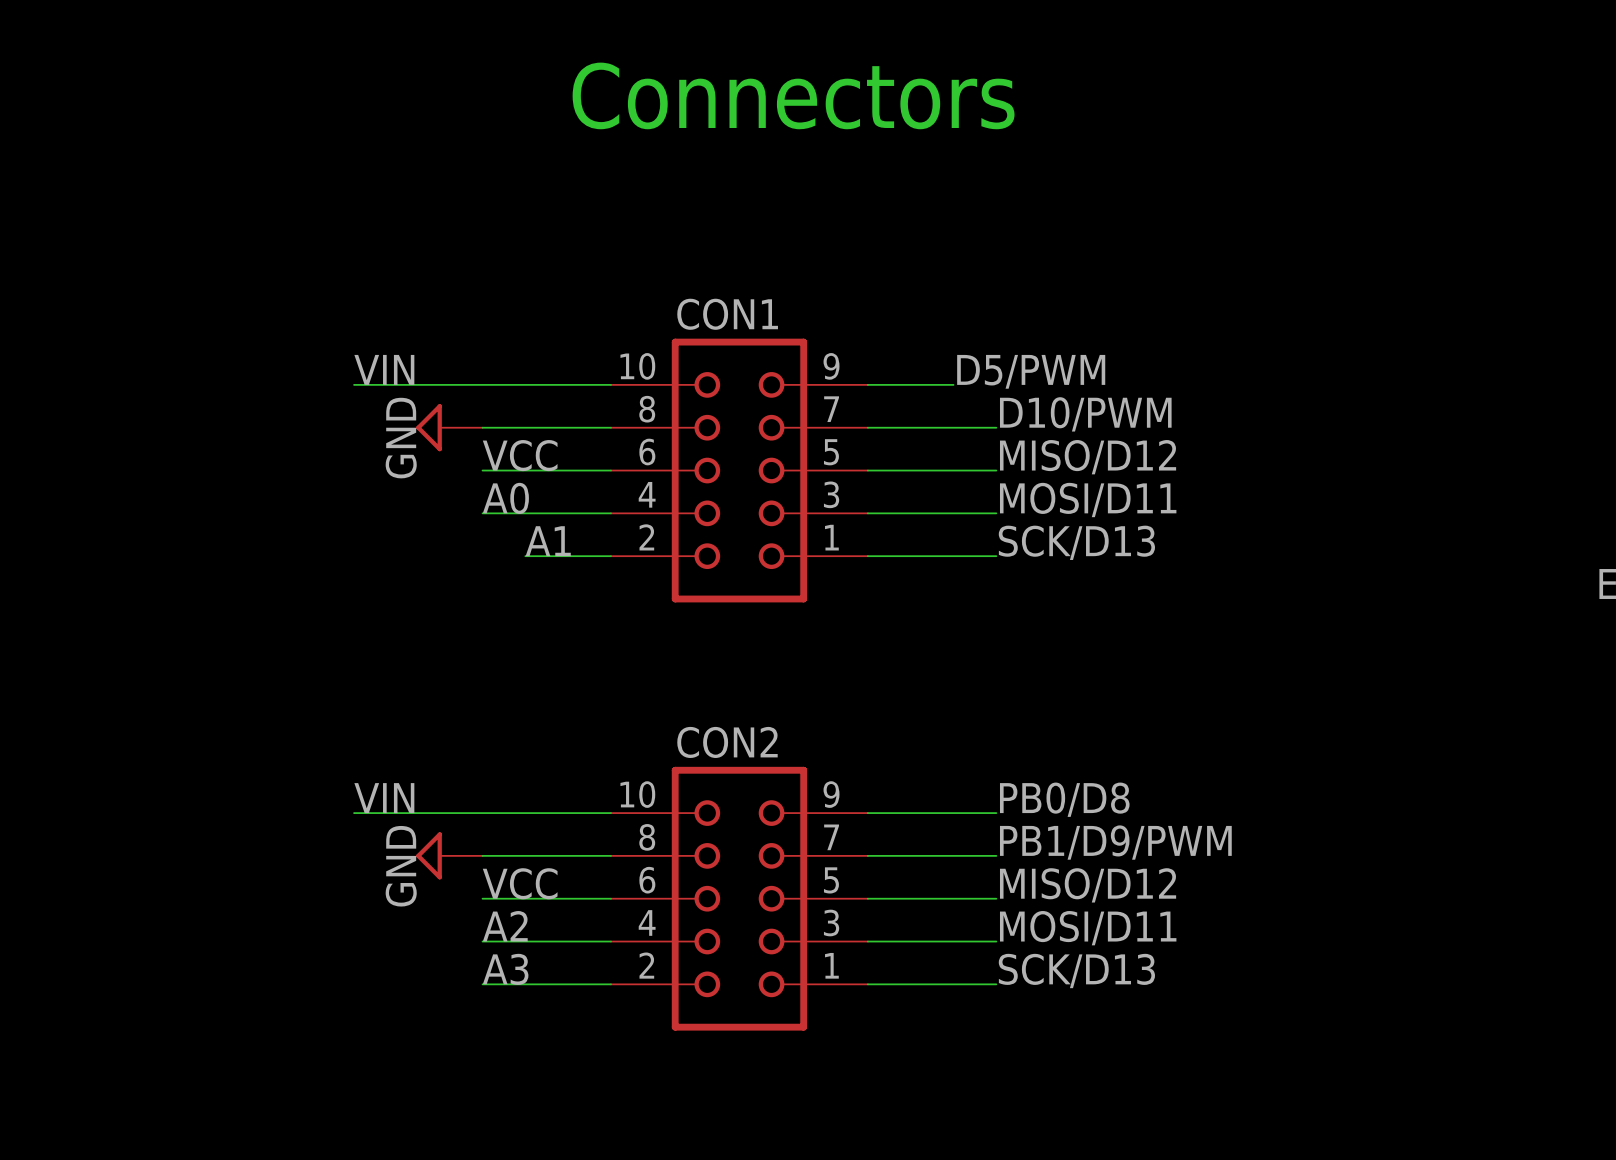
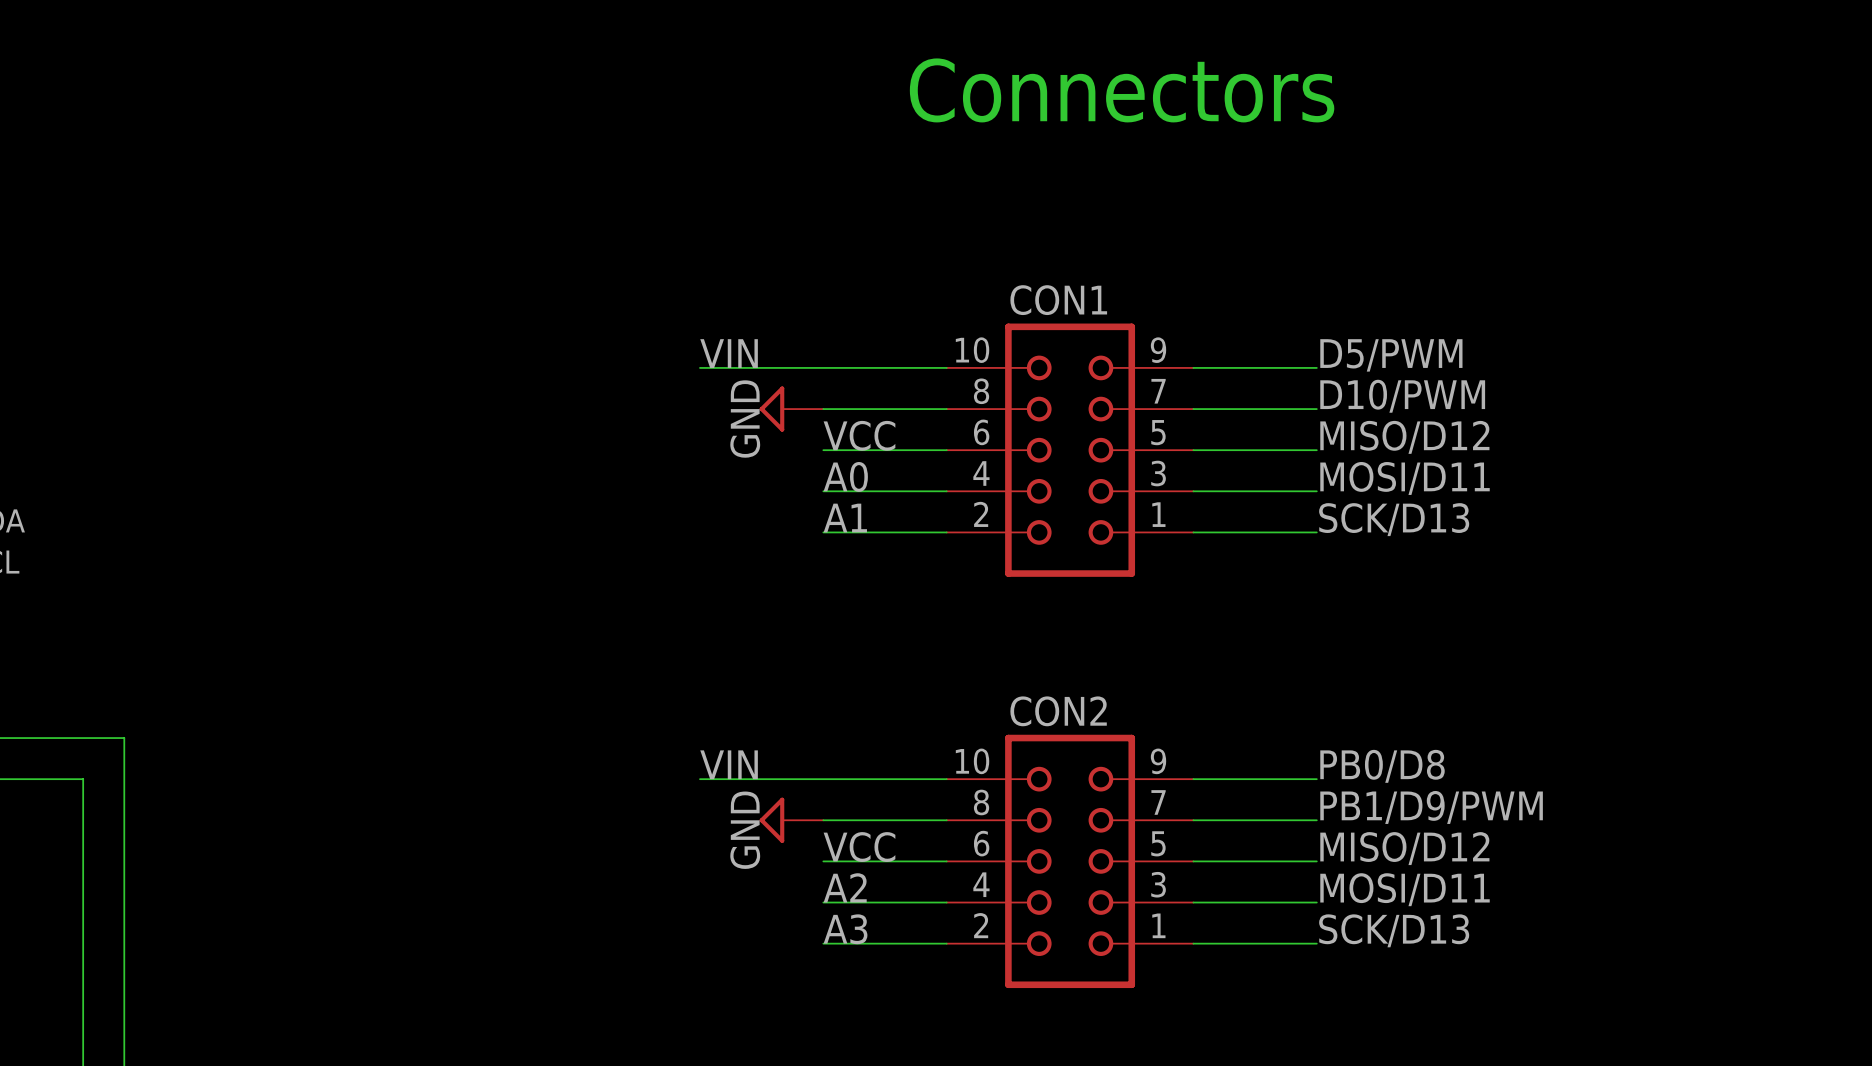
label position: D5/PWM (1031, 371) -> D5/PWM (1391, 355)
wire: none -> (1275, 367) (1316, 367)
label position: A1 (548, 541) -> A1 (845, 518)
wire: none -> (823, 532) (864, 532)

